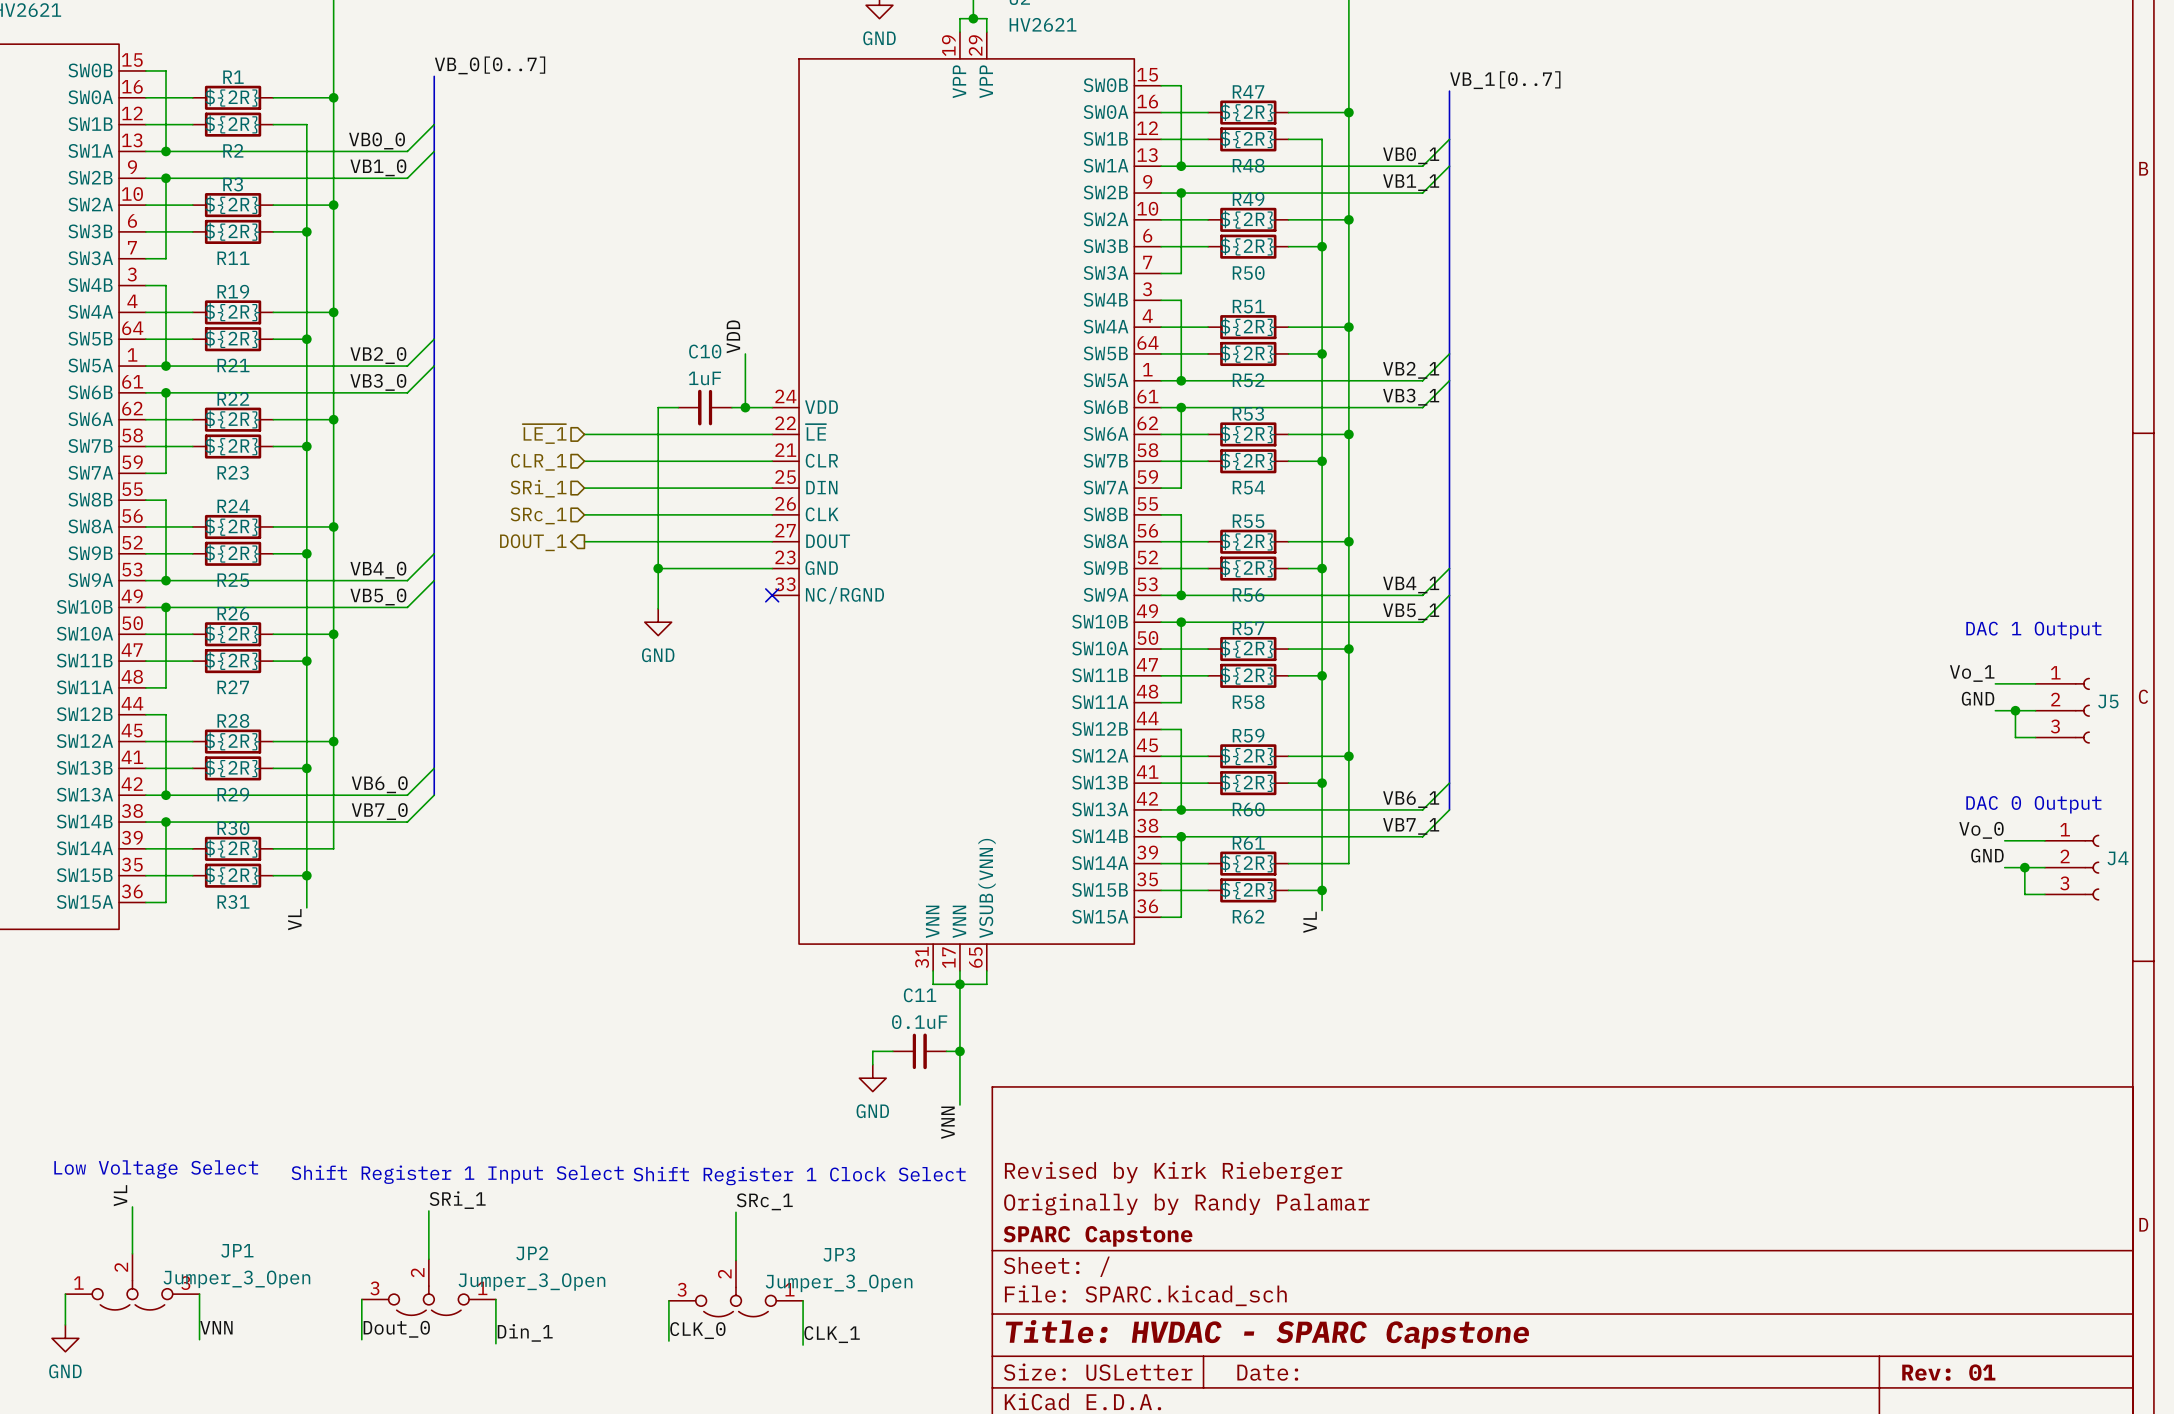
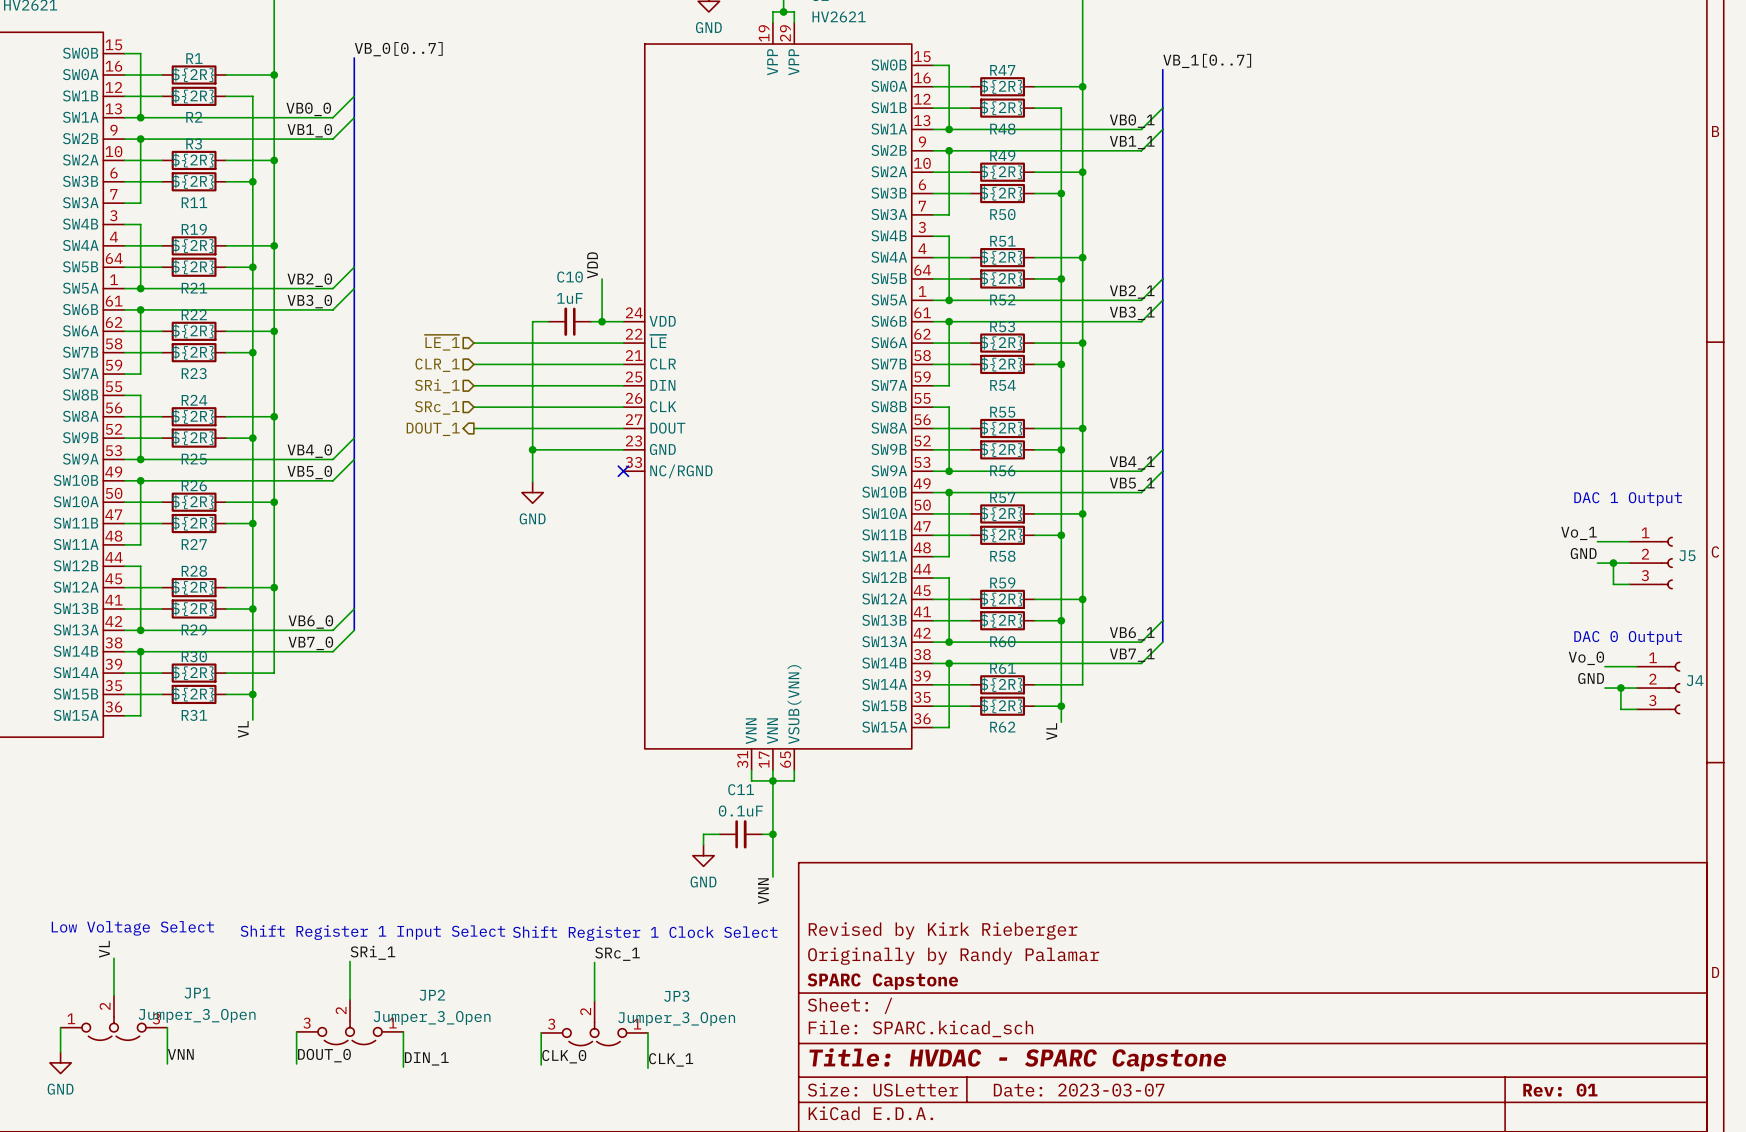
label: Dout_0 (396, 1329) -> DOUT_0 (324, 1055)
label: Din_1 (525, 1332) -> DIN_1 (426, 1058)
title block: Date: (1267, 1372) -> Date: 2023-03-07 (1079, 1090)

